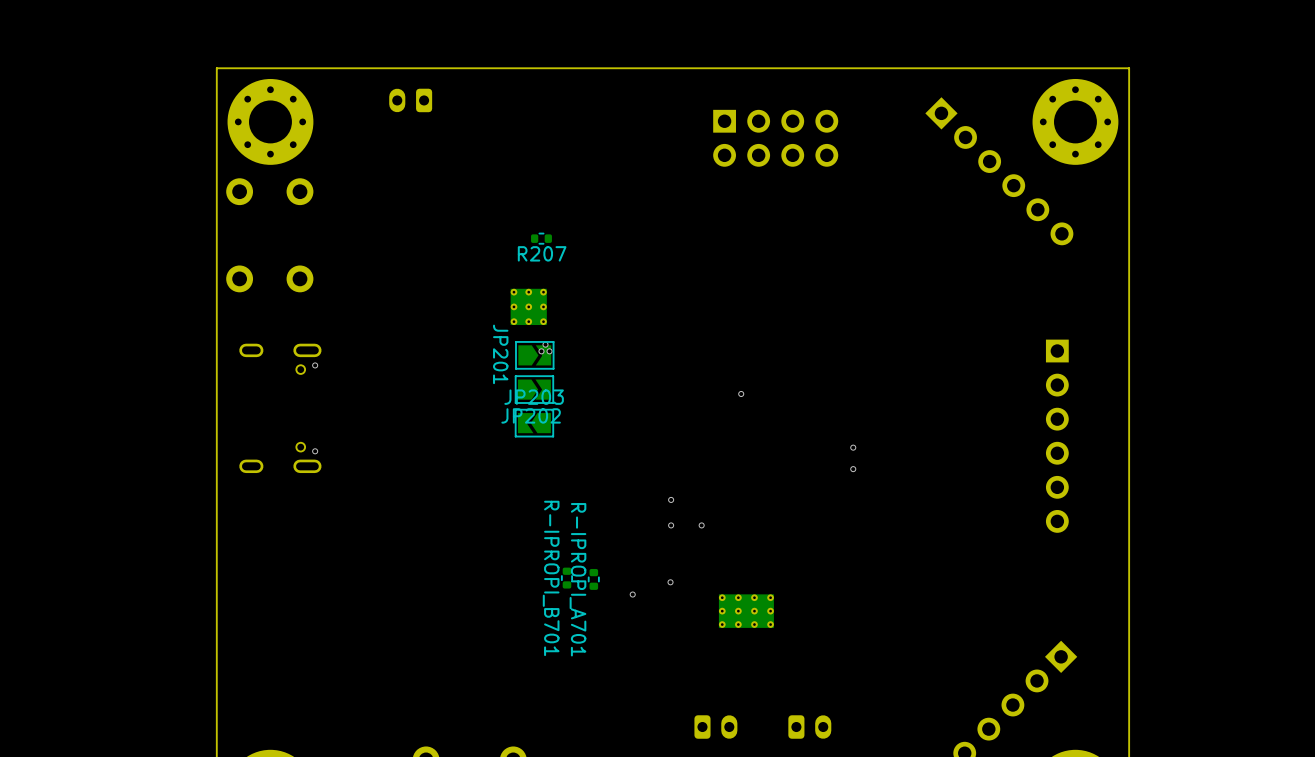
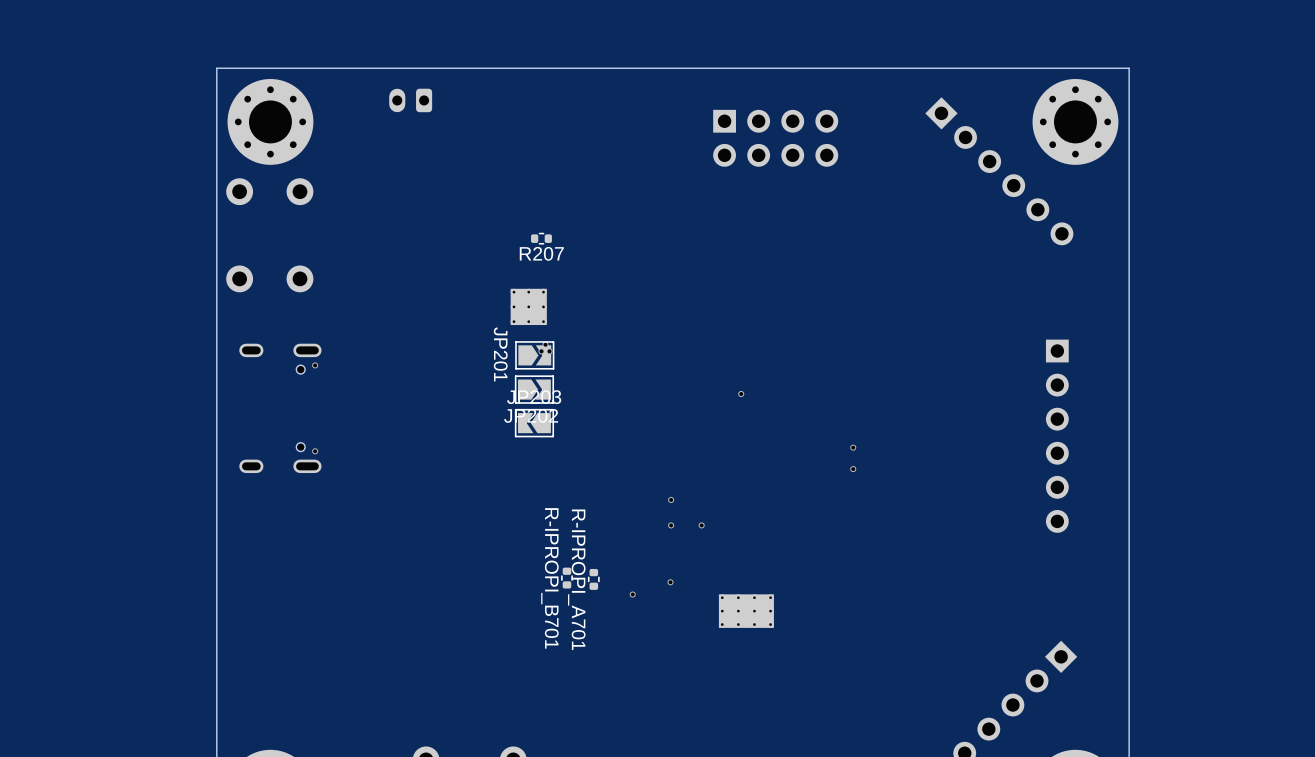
part: (715, 727) -> none
part: (809, 727) -> none

